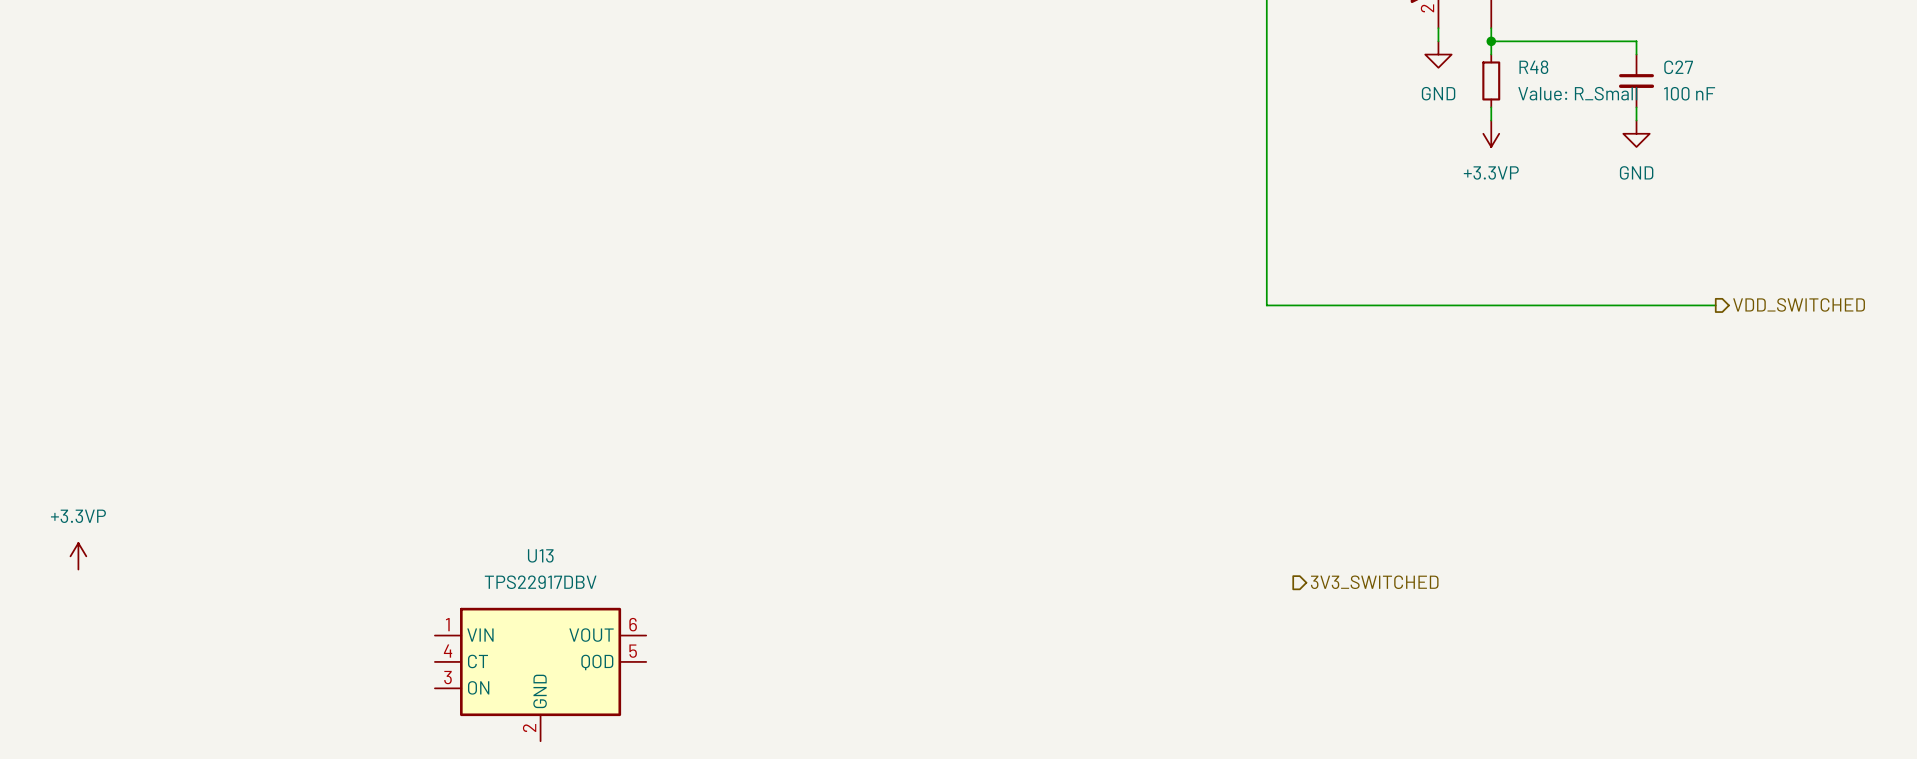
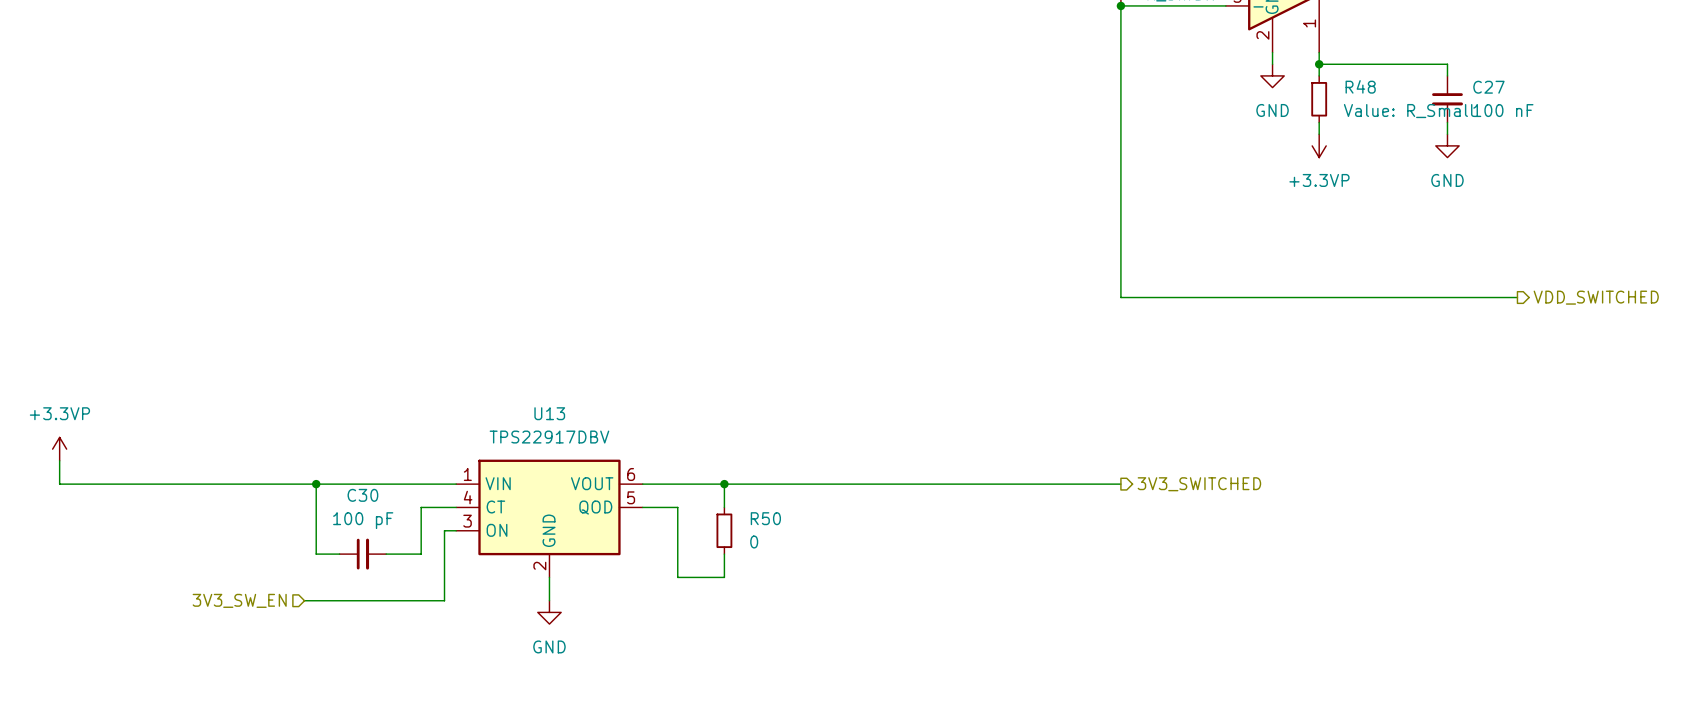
wire: none -> (59, 460) (59, 484) (456, 484)
wire: none -> (316, 484) (316, 554) (339, 554)
junction: none -> (316, 484)
wire: none -> (642, 484) (1120, 484)
wire: none -> (724, 484) (724, 507)
junction: none -> (724, 484)
wire: none -> (456, 507) (421, 507) (421, 554) (386, 554)
wire: none -> (642, 507) (677, 507) (677, 577) (724, 577) (724, 554)
power symbol position: +3.3VP (78, 556) -> +3.3VP (59, 449)
wire: none -> (456, 530) (444, 530) (444, 600) (304, 600)
R50: none -> 0 (724, 530)
hierarchical label position: 3V3_SWITCHED (1374, 582) -> 3V3_SWITCHED (1199, 484)
C30: none -> 100 pF (362, 554)
hierarchical label: none -> 3V3_SW_EN (239, 600)
power symbol: none -> GND (549, 612)
U13 position: (540, 674) -> (549, 518)

